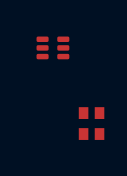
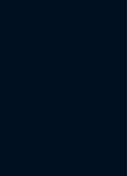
part: (52, 47) -> none
part: (91, 123) -> none

